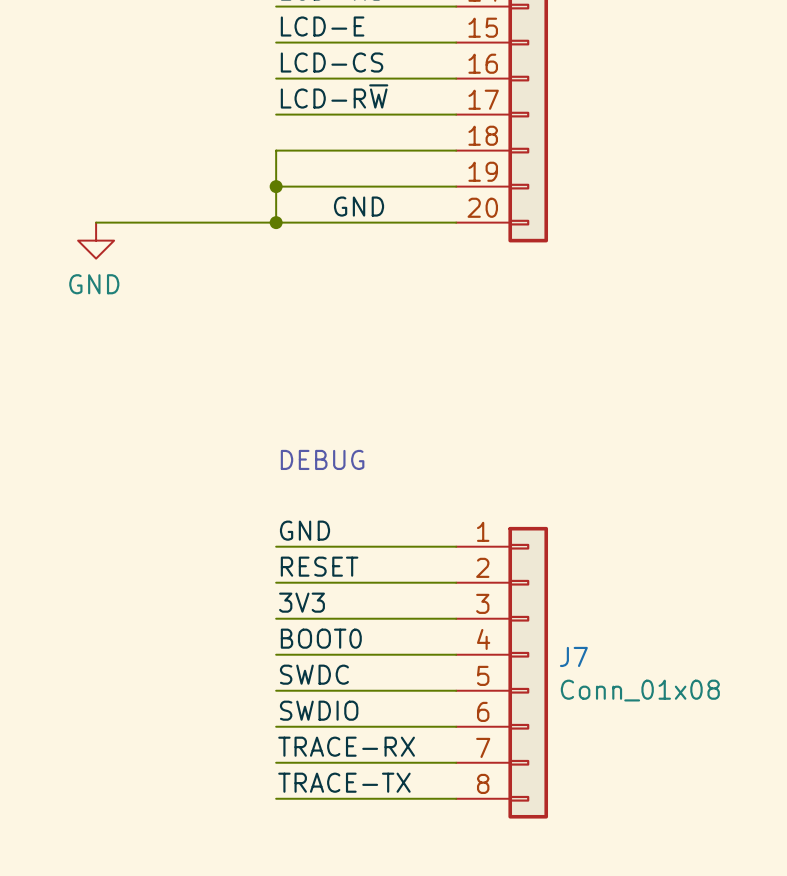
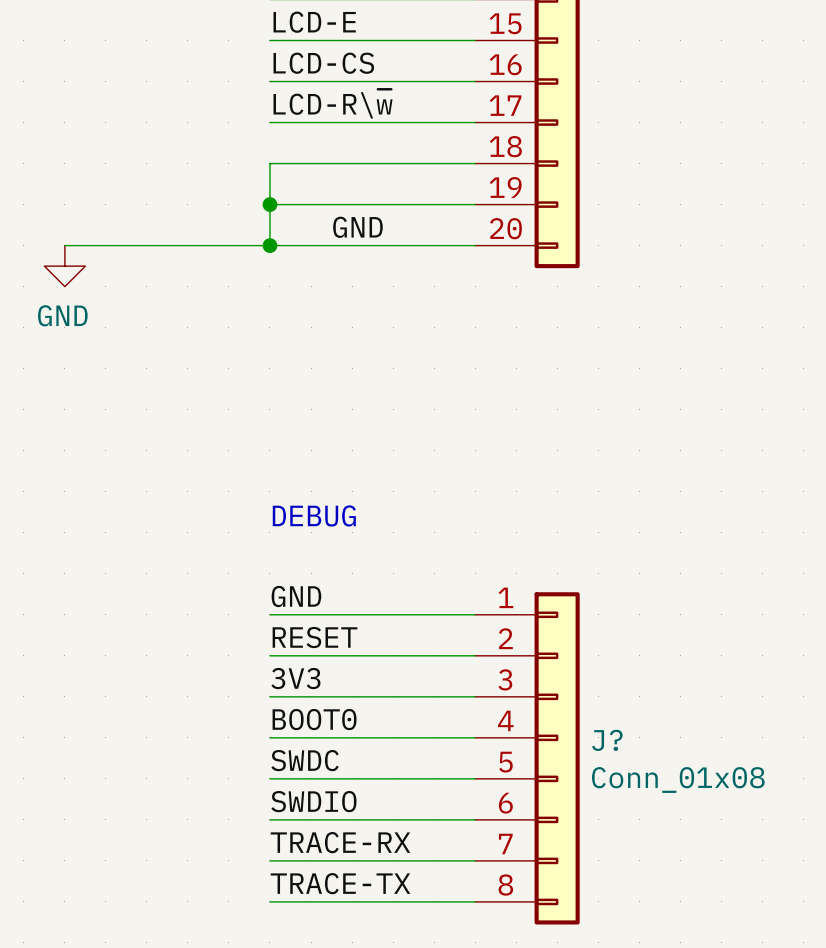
label: LCD-R~{W} (334, 96) -> LCD-R\~{w} (333, 103)
J7 name: J7 (573, 656) -> J? (607, 740)

